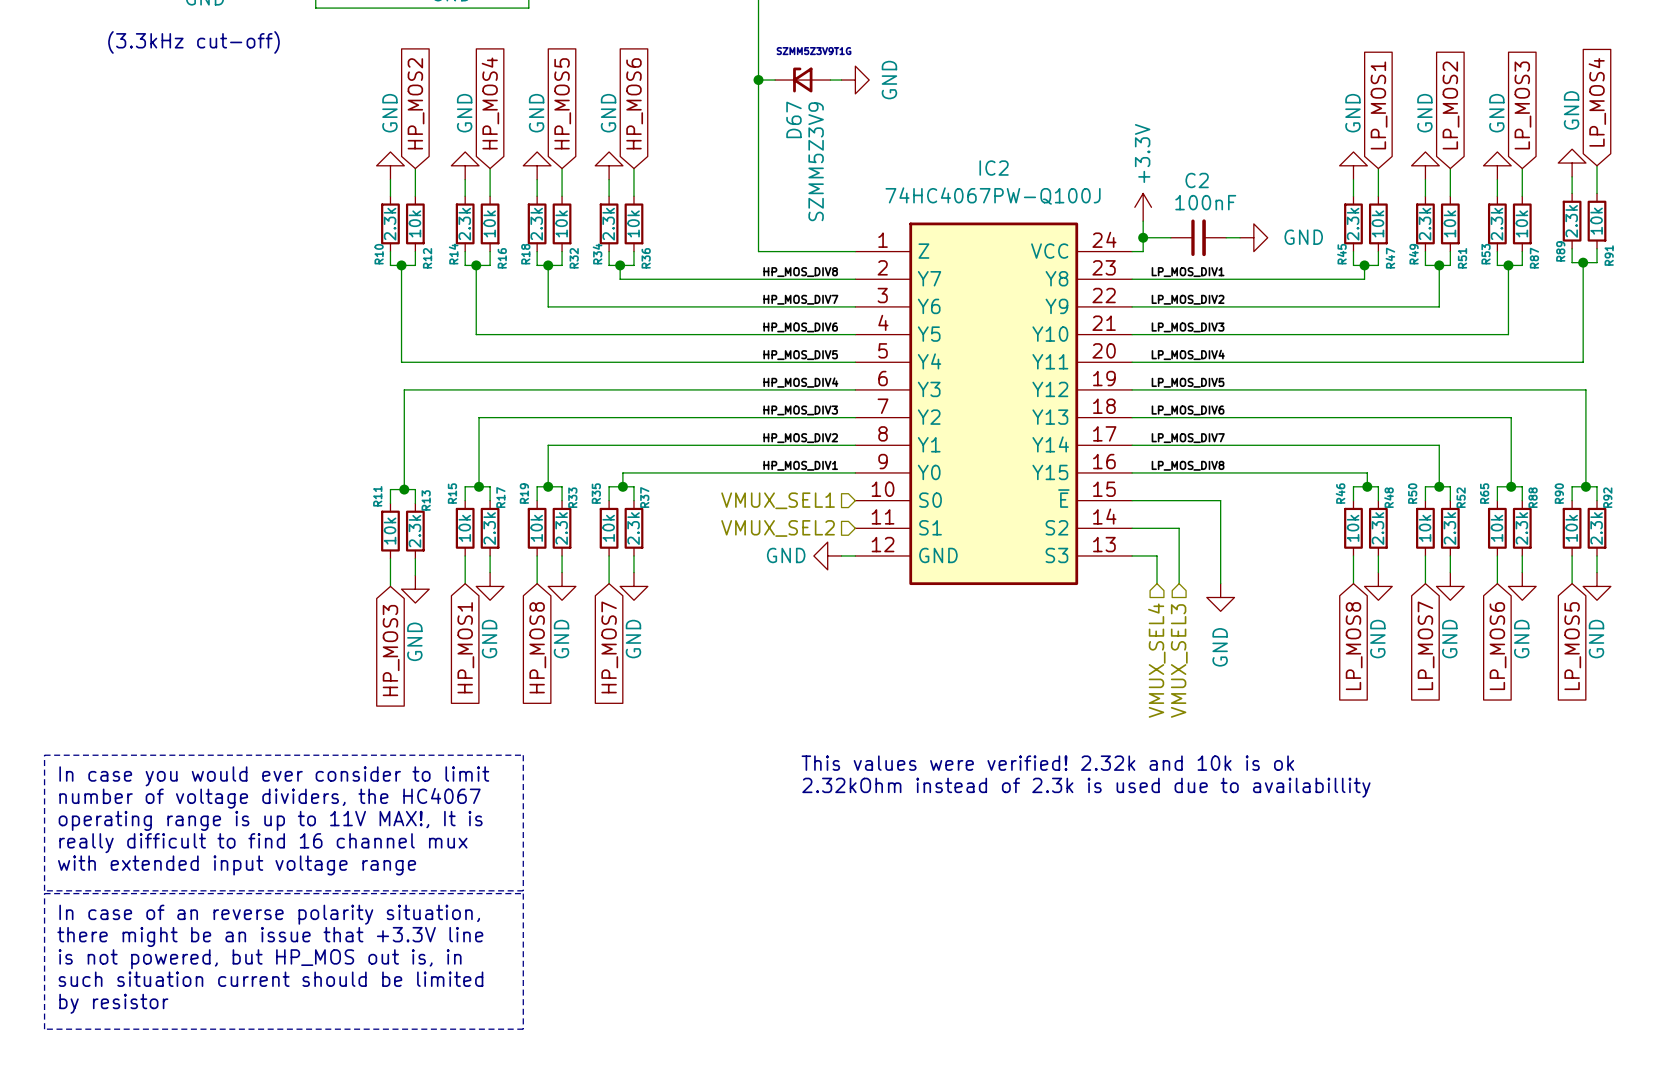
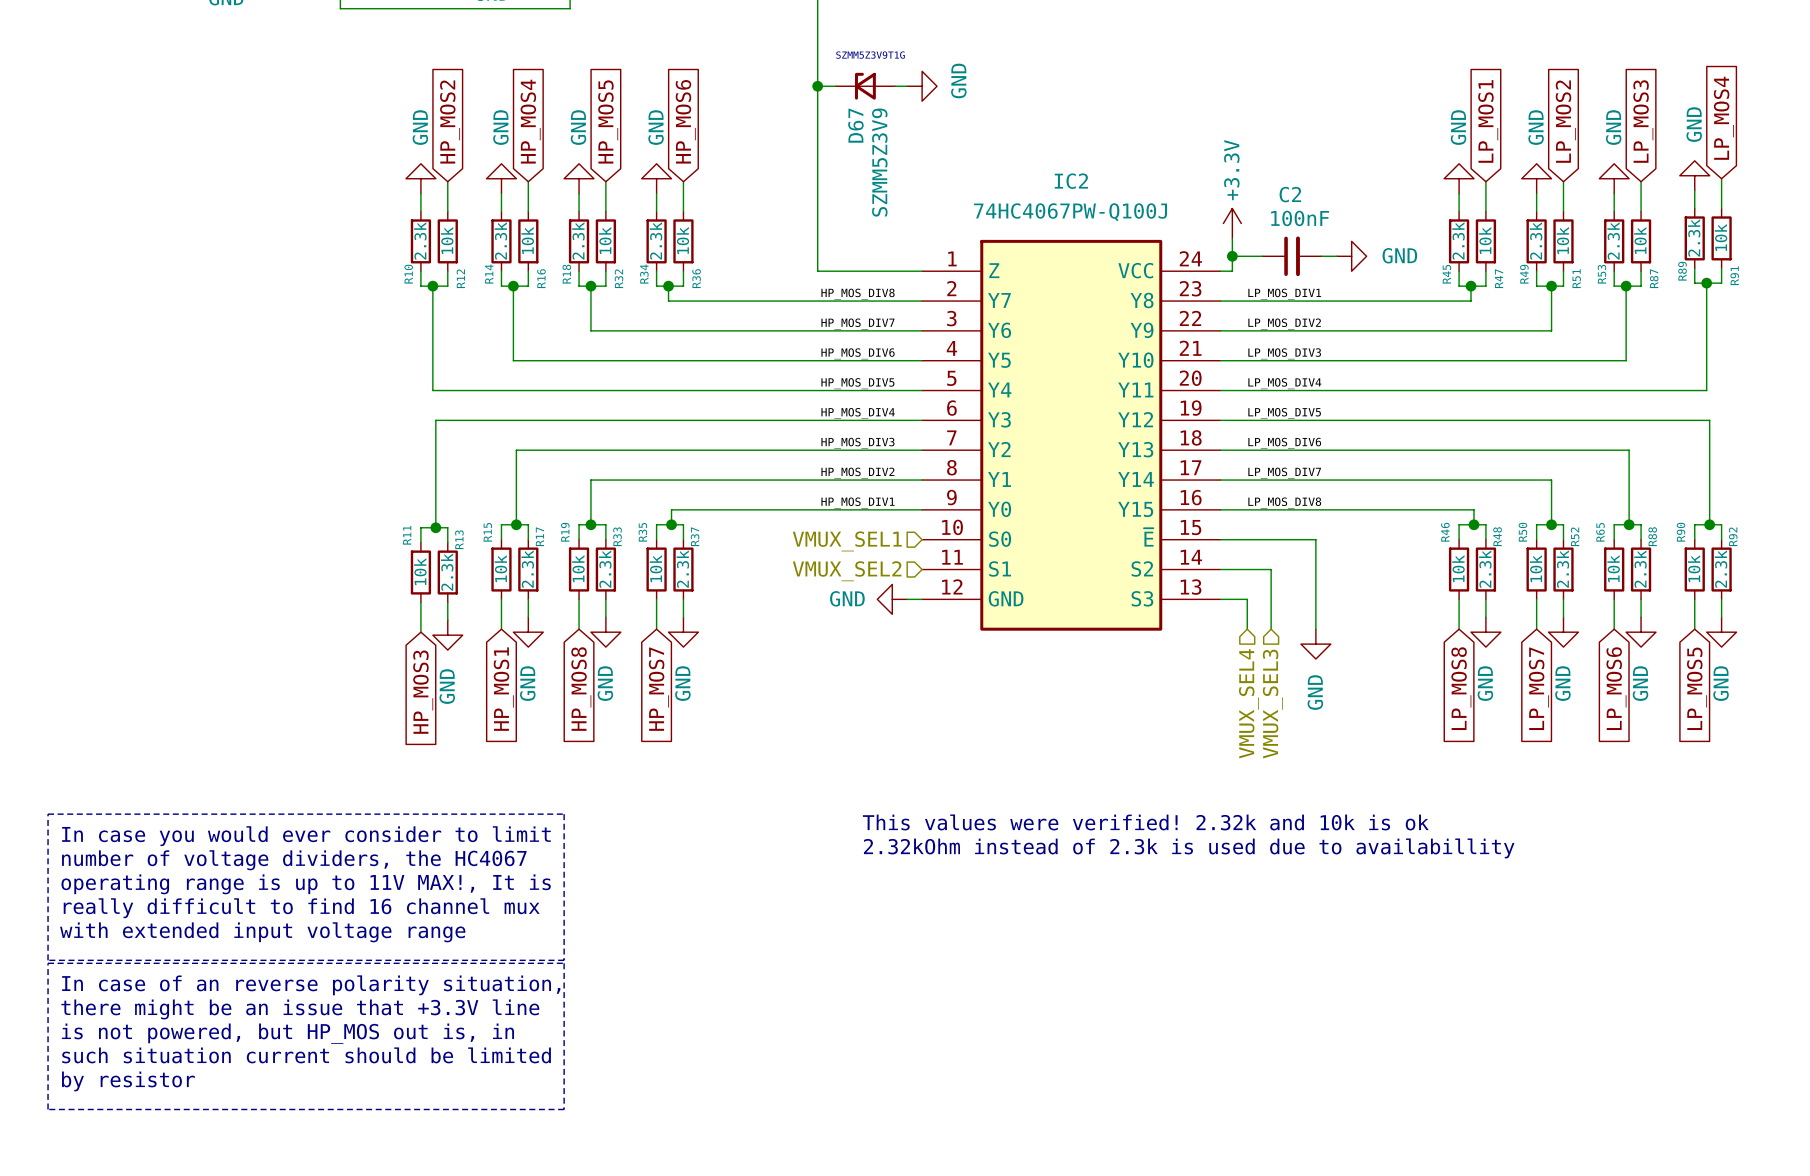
text: (3.3kHz cut-off) (193, 42) -> none

